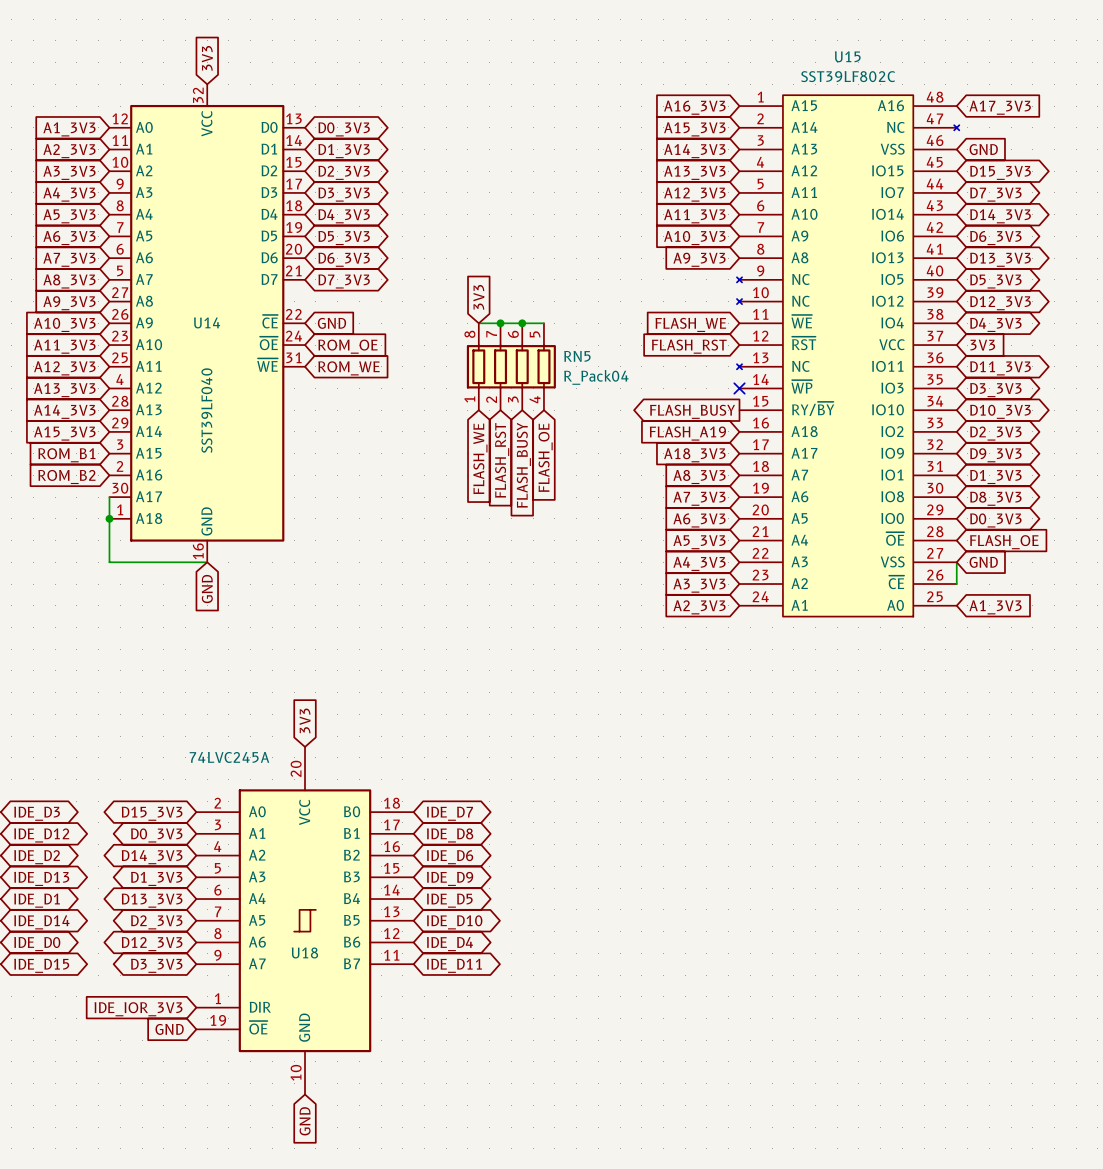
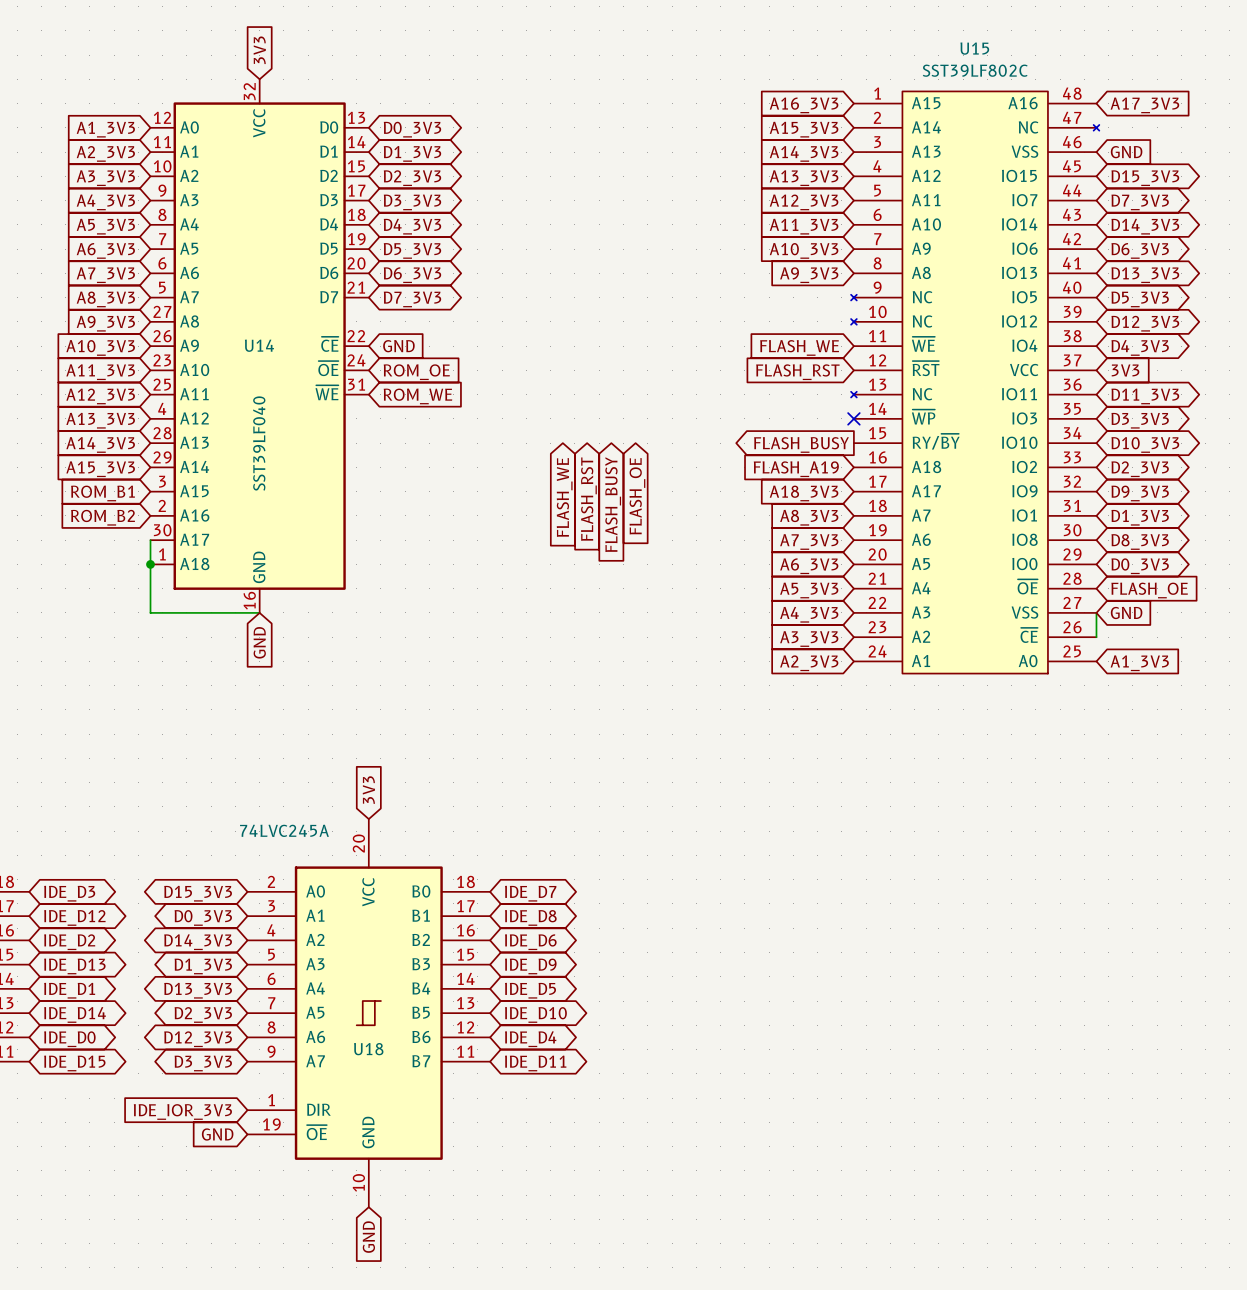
global label: 3V3 (478, 297) -> none
wire: (478, 323) (543, 323) -> none
junction: (500, 323) -> none
junction: (522, 323) -> none
RN5: R_Pack04 (511, 366) -> none

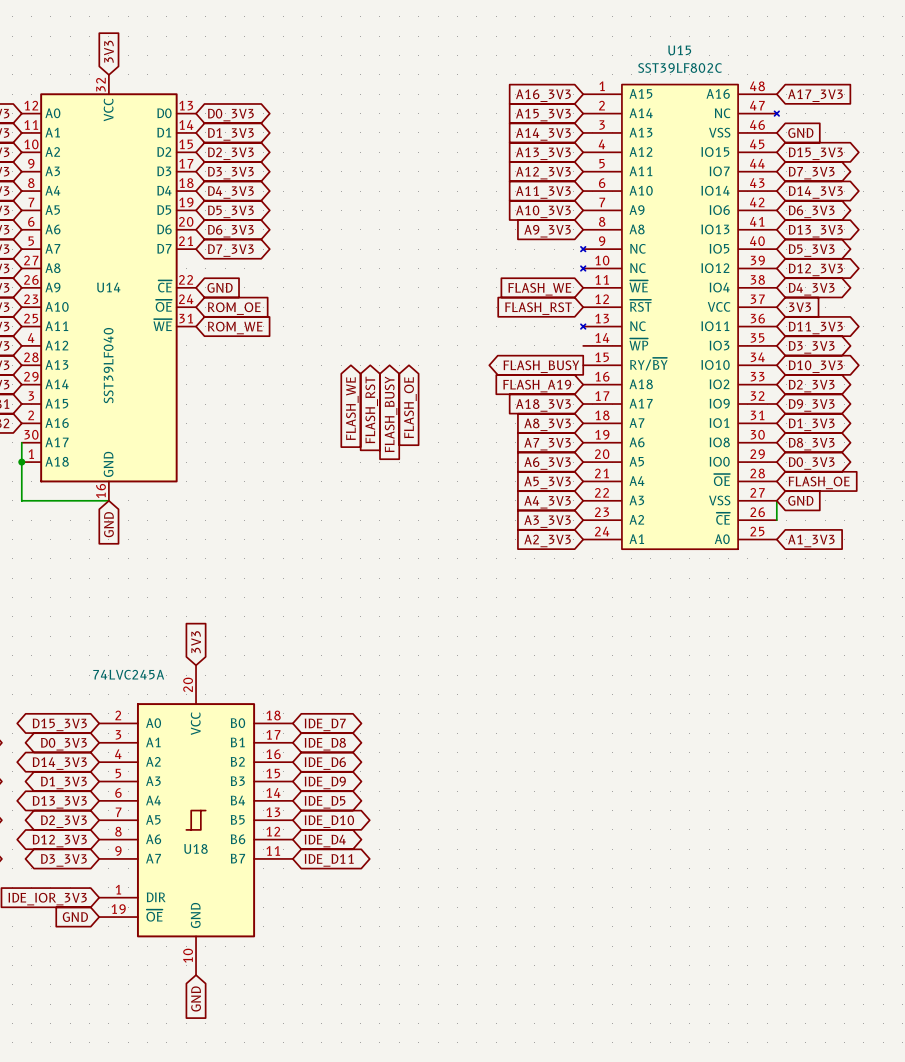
no-connect mark: (853, 418) -> none

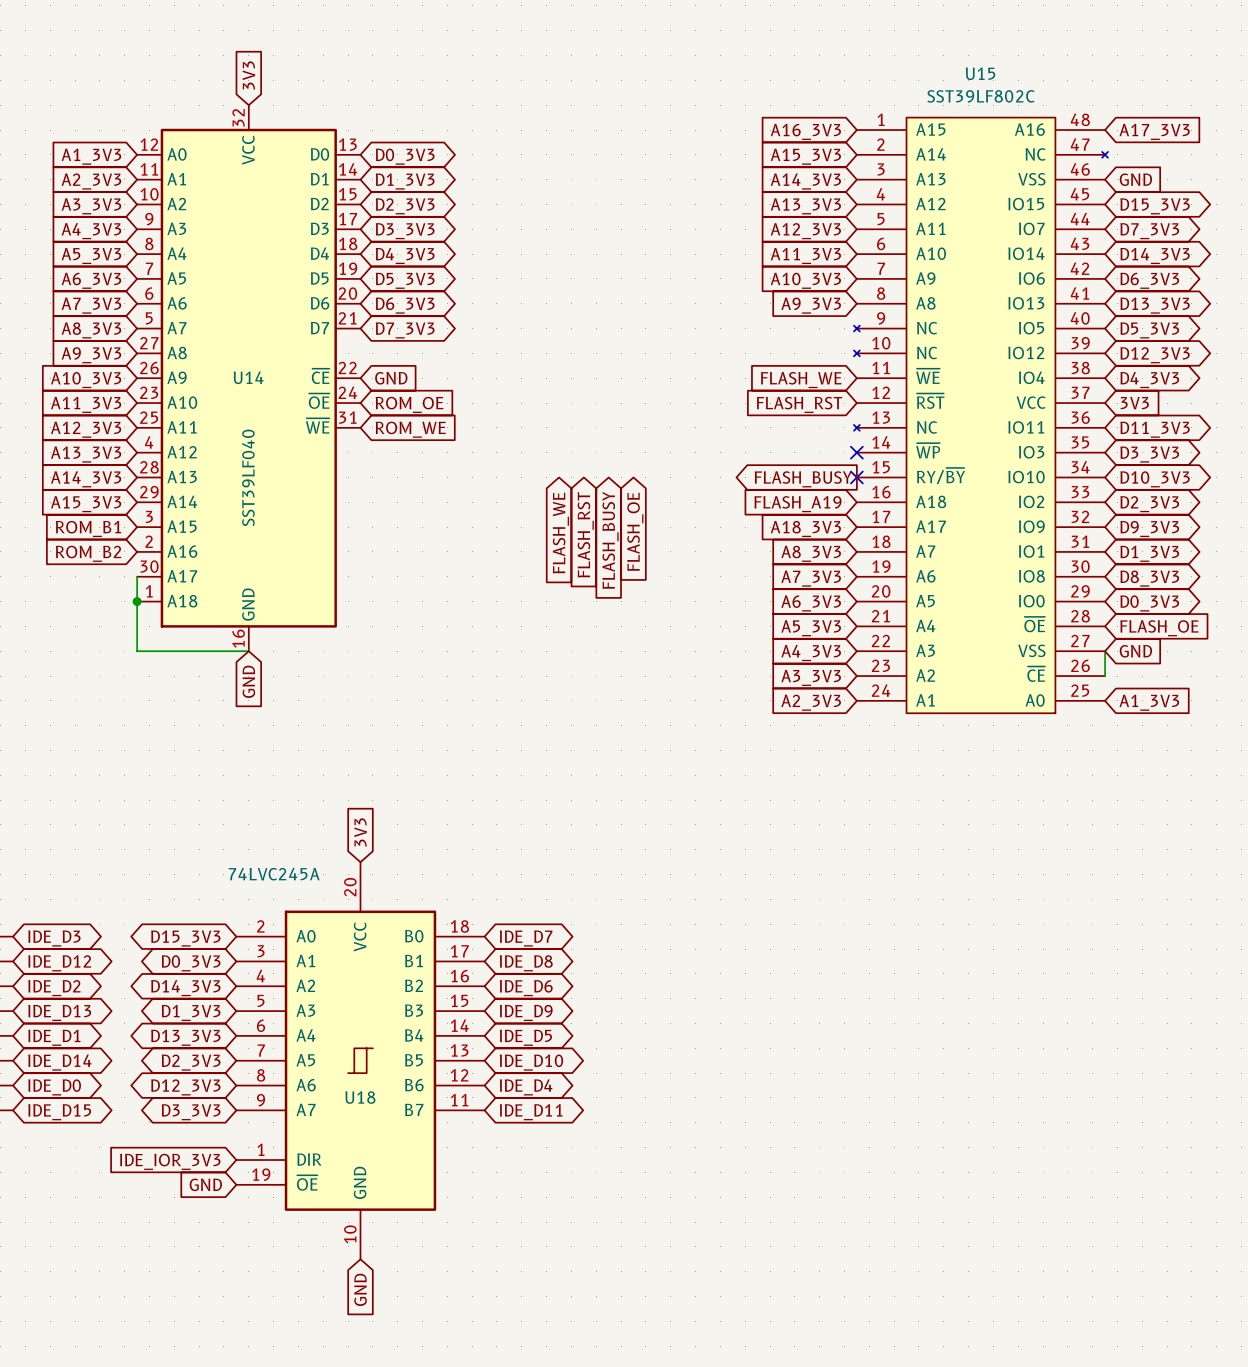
no-connect mark: none -> (856, 452)
no-connect mark: none -> (856, 477)

